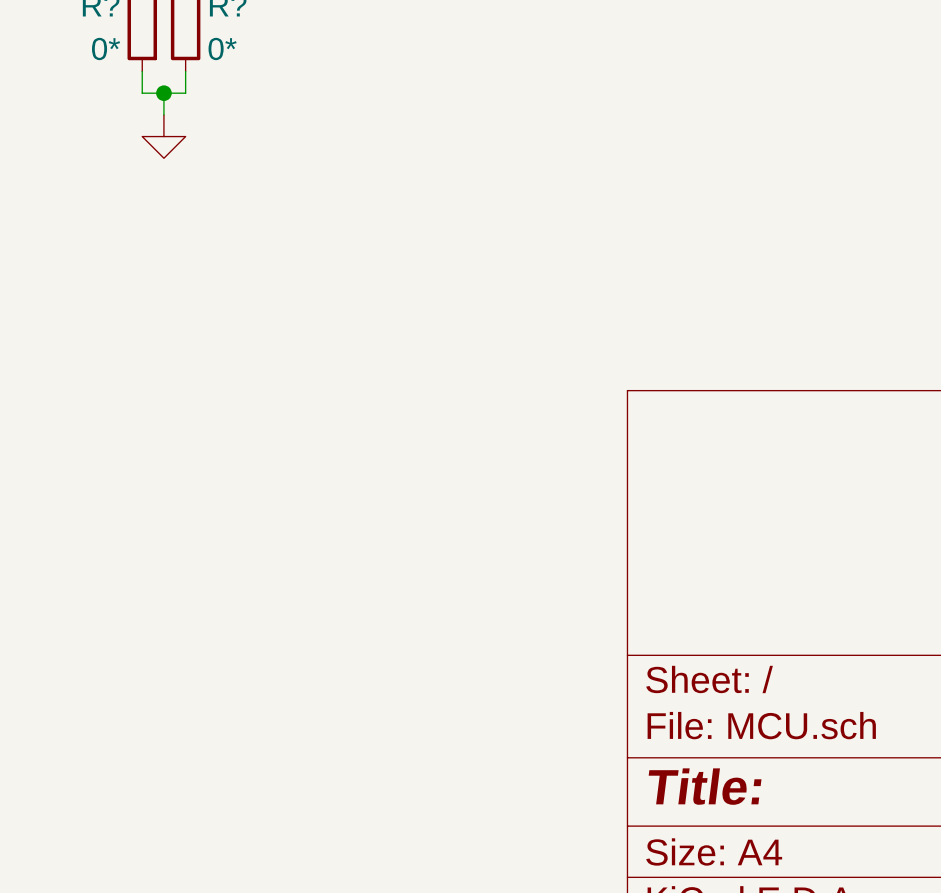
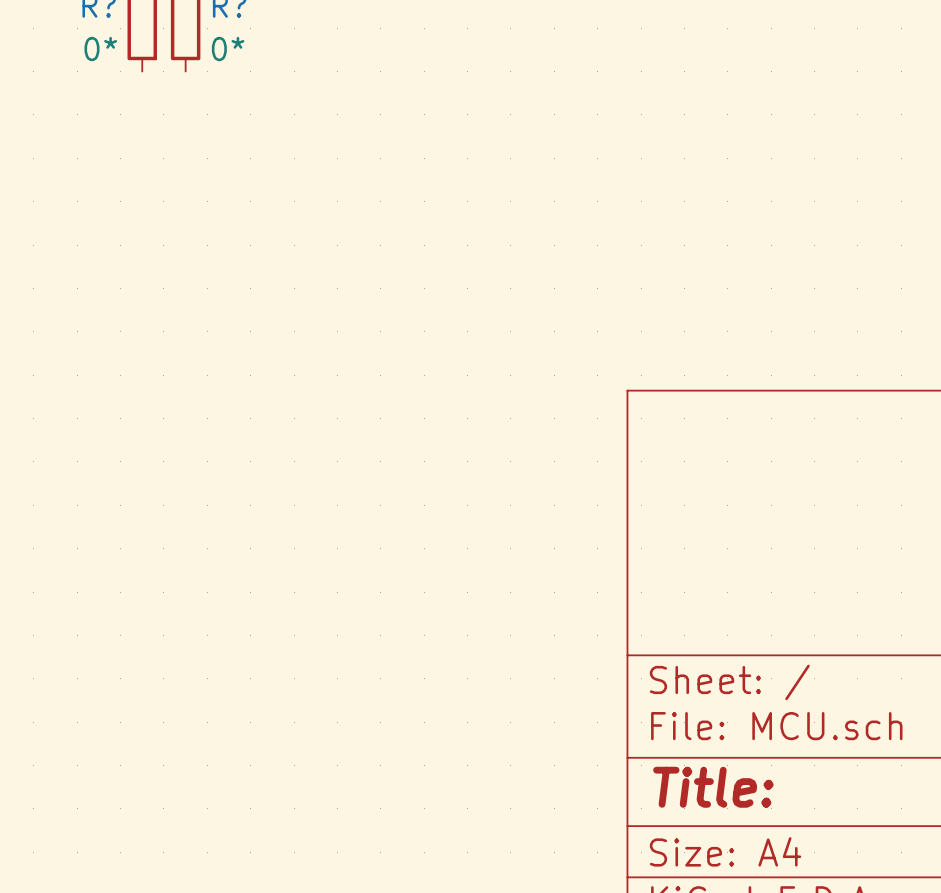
wire: (142, 71) (142, 93) (185, 93) (185, 71) -> none
wire: (163, 93) (163, 114) -> none
junction: (163, 93) -> none
power symbol: (163, 136) -> none

